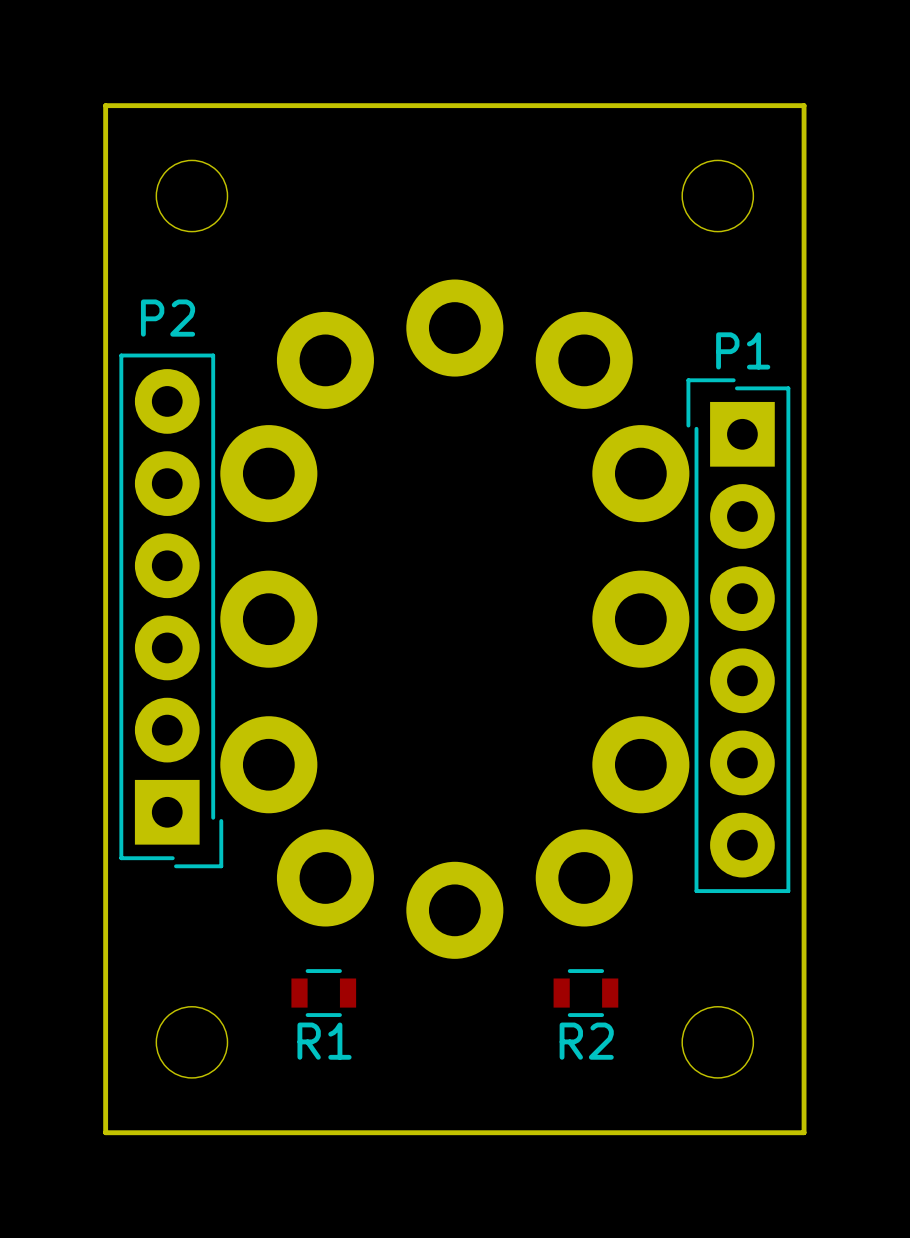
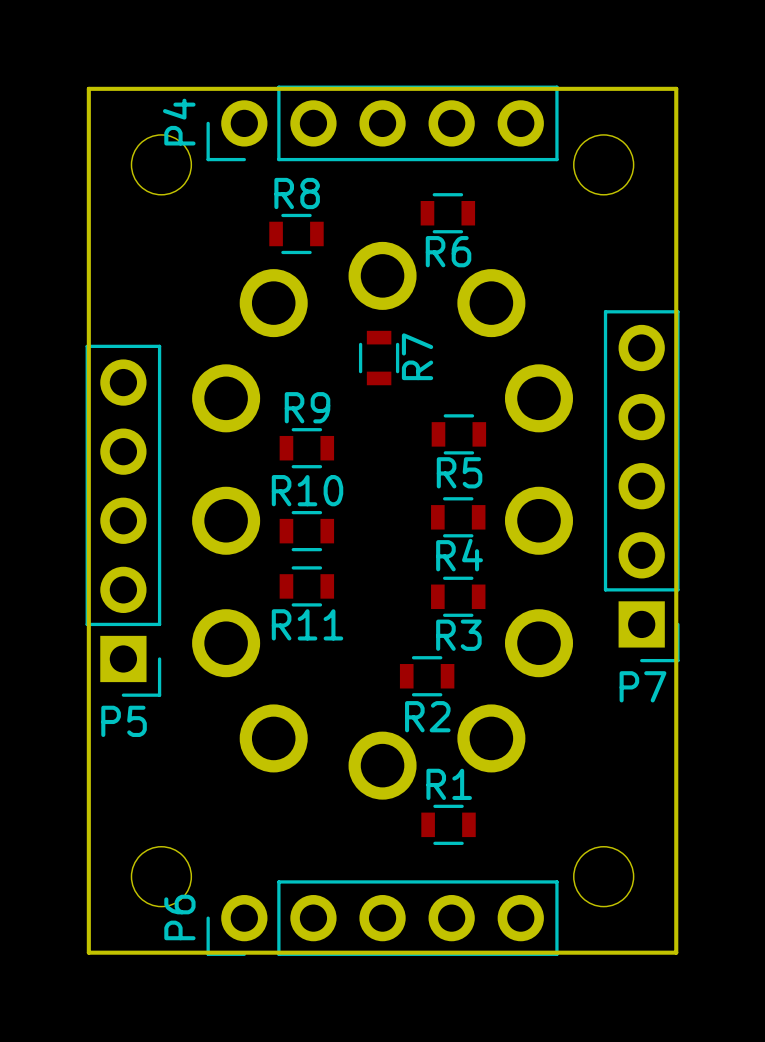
P4: none -> (382, 123)
R6: none -> (447, 213)
R8: none -> (296, 233)
part footprint: [220, 279, 690, 959] -> [192, 241, 574, 800]
R7: none -> (379, 358)
R5: none -> (458, 434)
R9: none -> (306, 448)
P7: none -> (641, 486)
P2: (171, 610) -> none
R4: none -> (458, 517)
P5: none -> (123, 520)
R10: none -> (306, 531)
P1: (738, 635) -> none
R11: none -> (306, 586)
R3: none -> (458, 596)
R1 position: (323, 993) -> (448, 824)
R2 position: (585, 993) -> (427, 676)
R1 name position: R1 (324, 1041) -> R1 (449, 784)
P6: none -> (382, 918)

